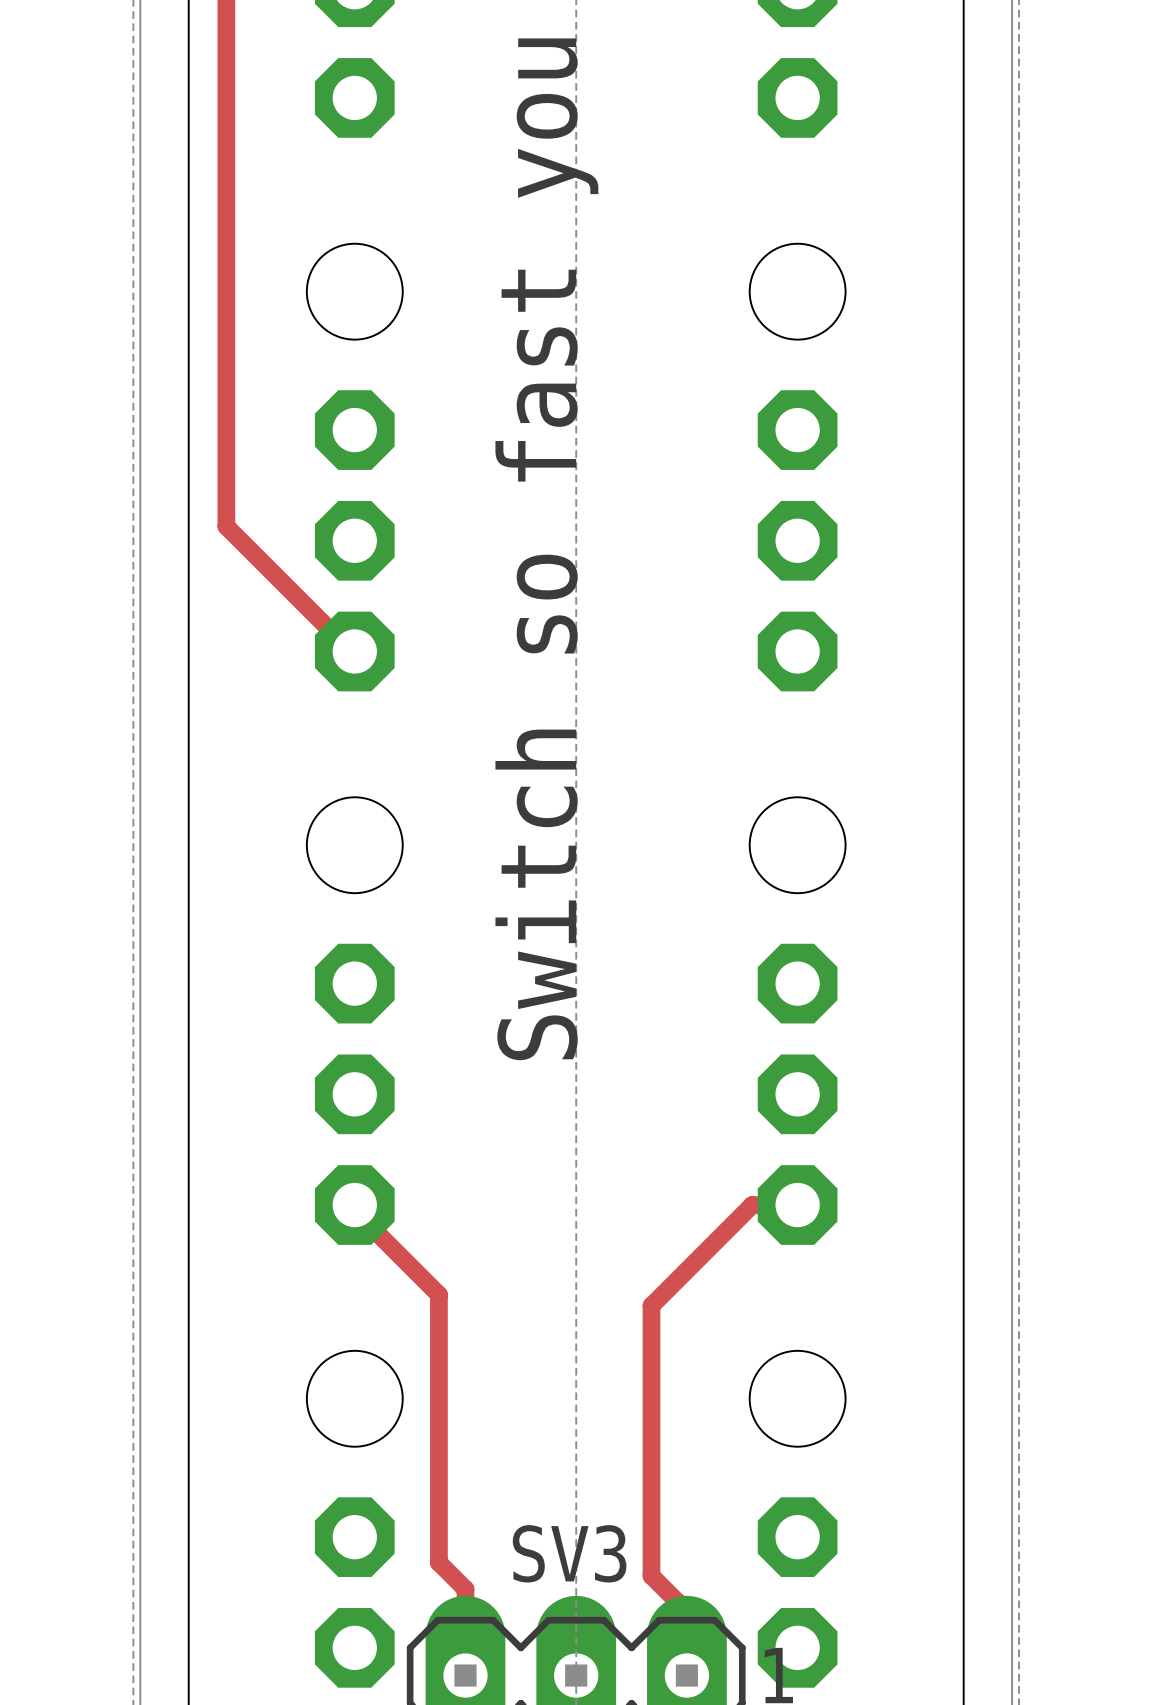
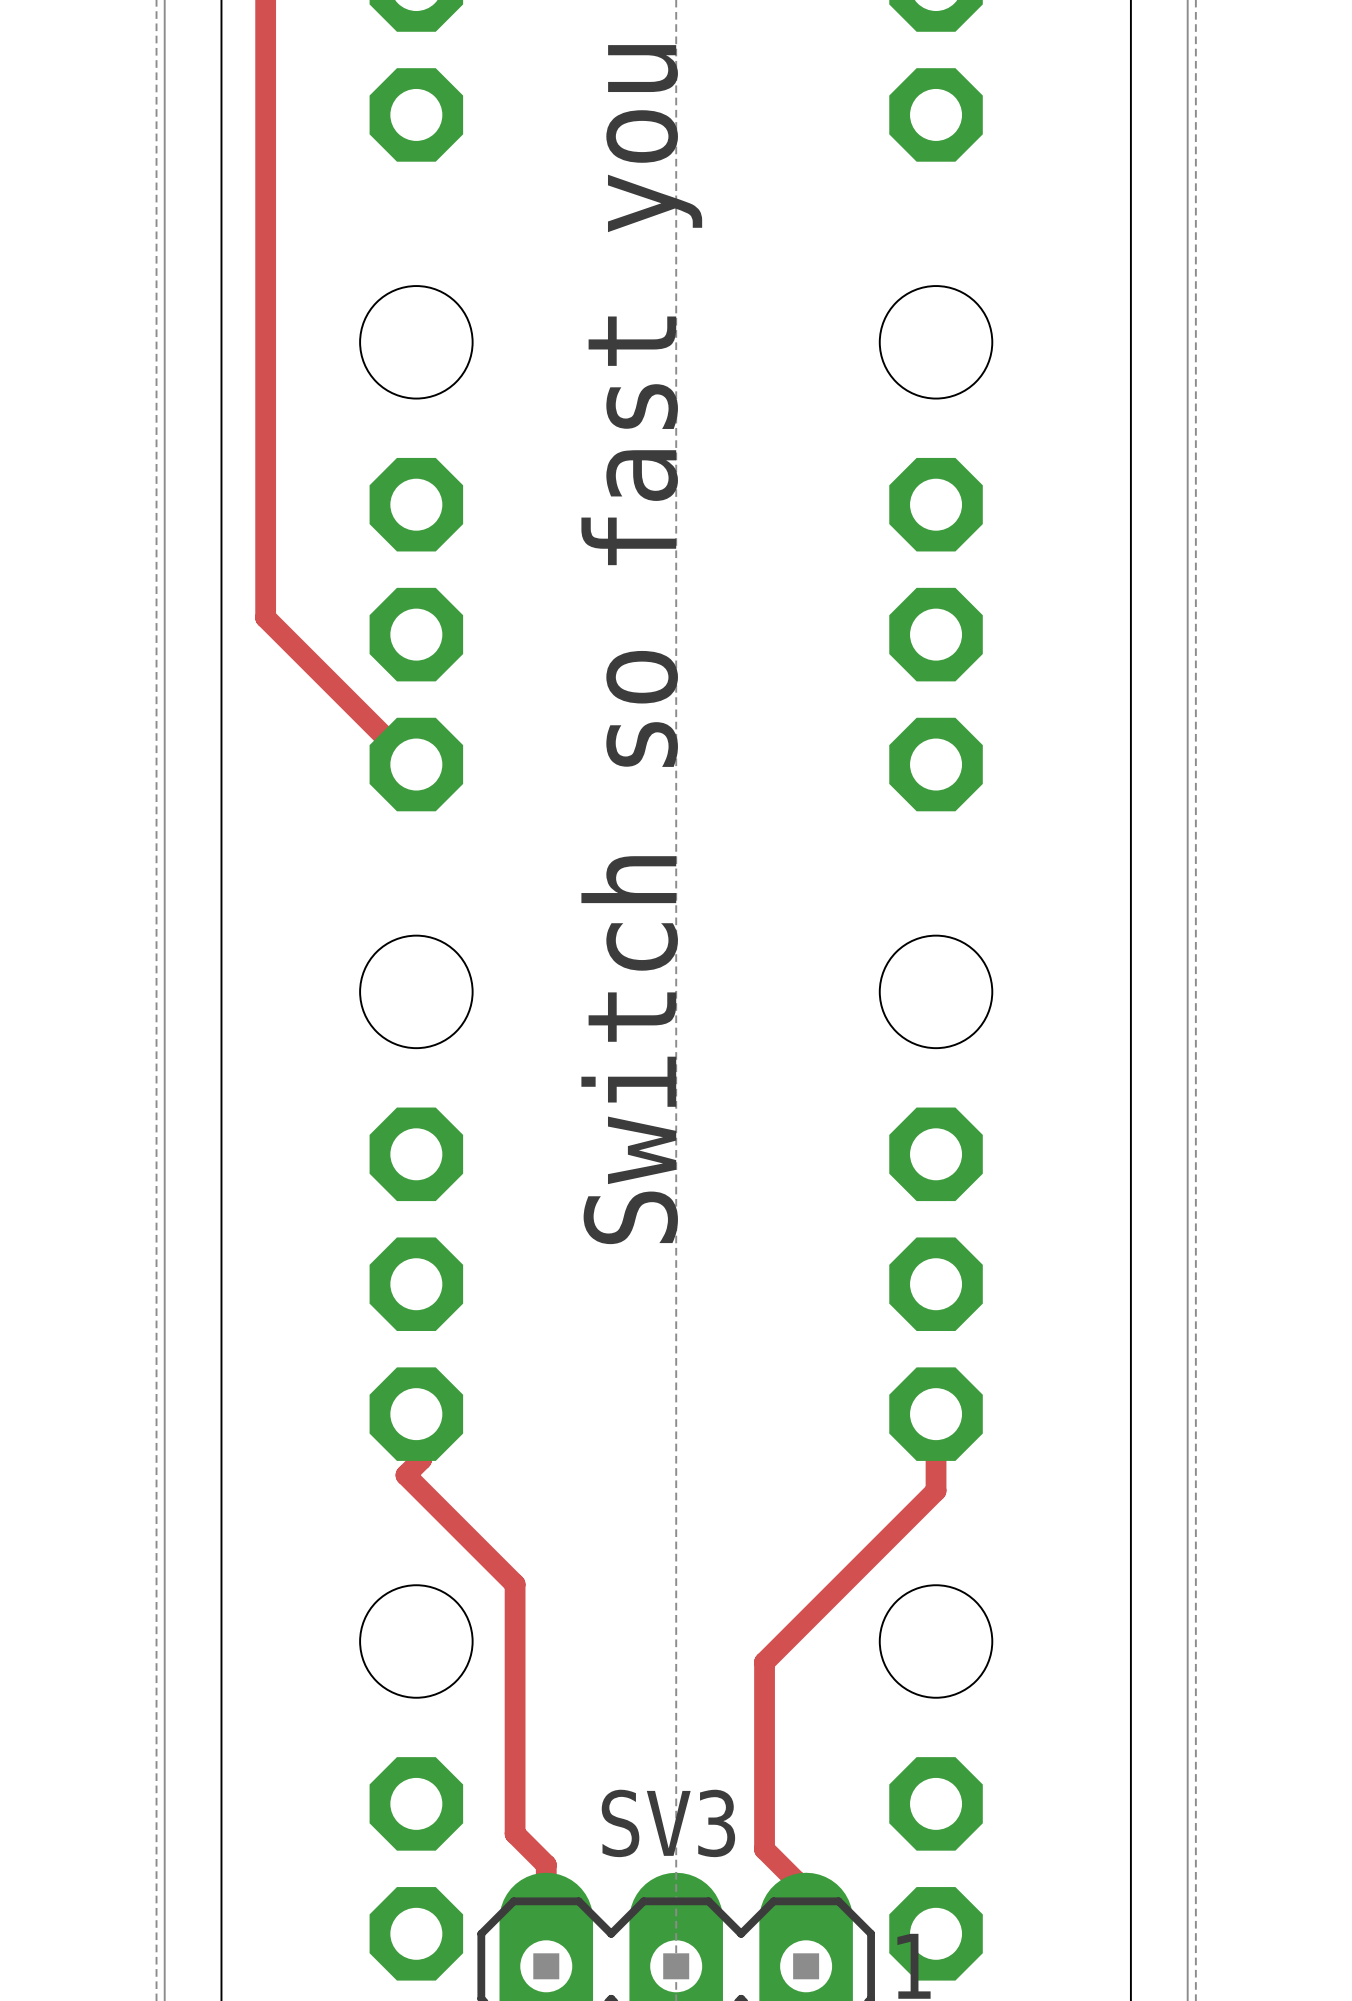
track: (797, 1205) (752, 1205) (651, 1305) (651, 1416) -> (936, 1414) (936, 1490) (764, 1662)
track: (357, 1213) (438, 1294) (438, 1350) -> (420, 1424) (421, 1459) (405, 1475) (515, 1584)

